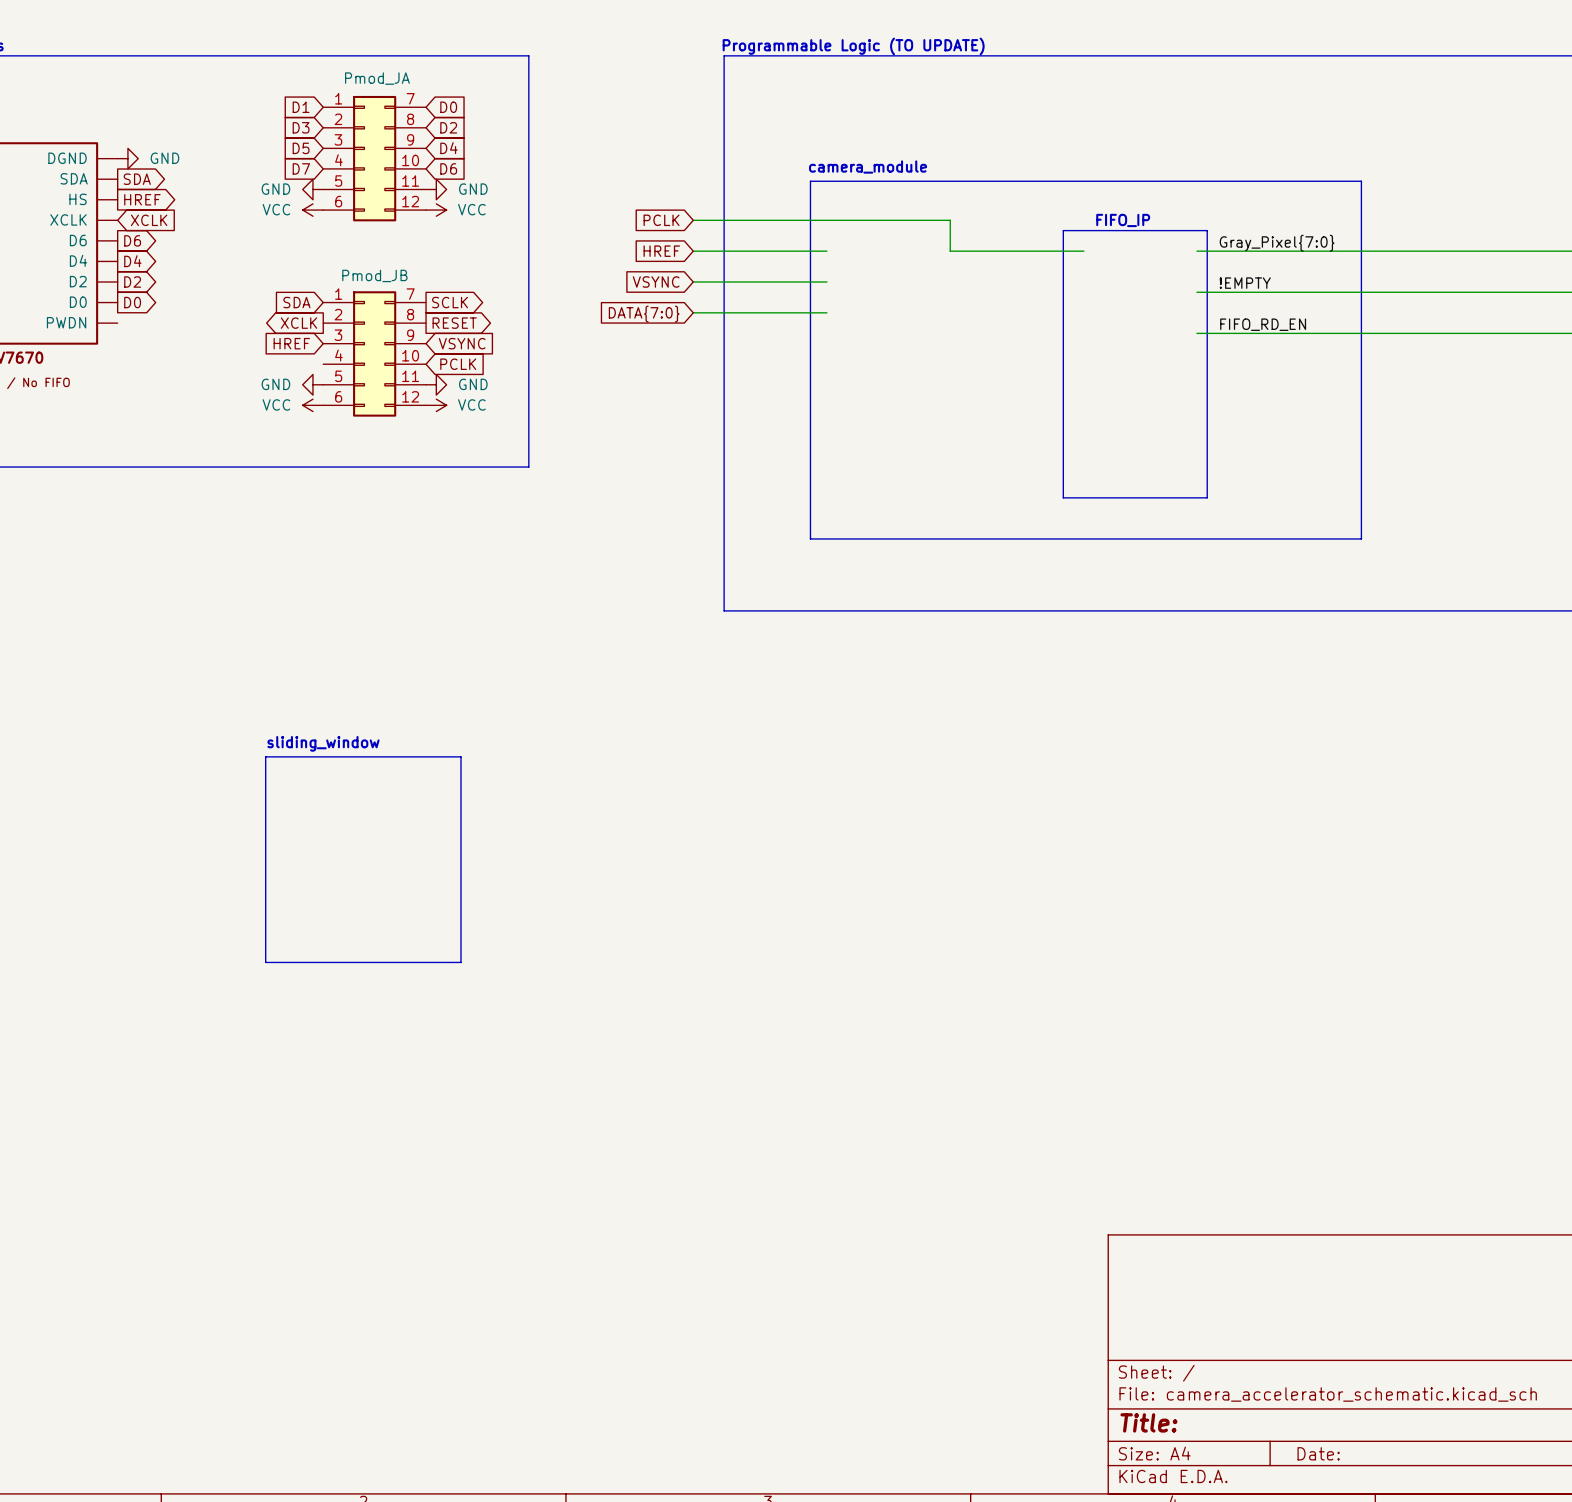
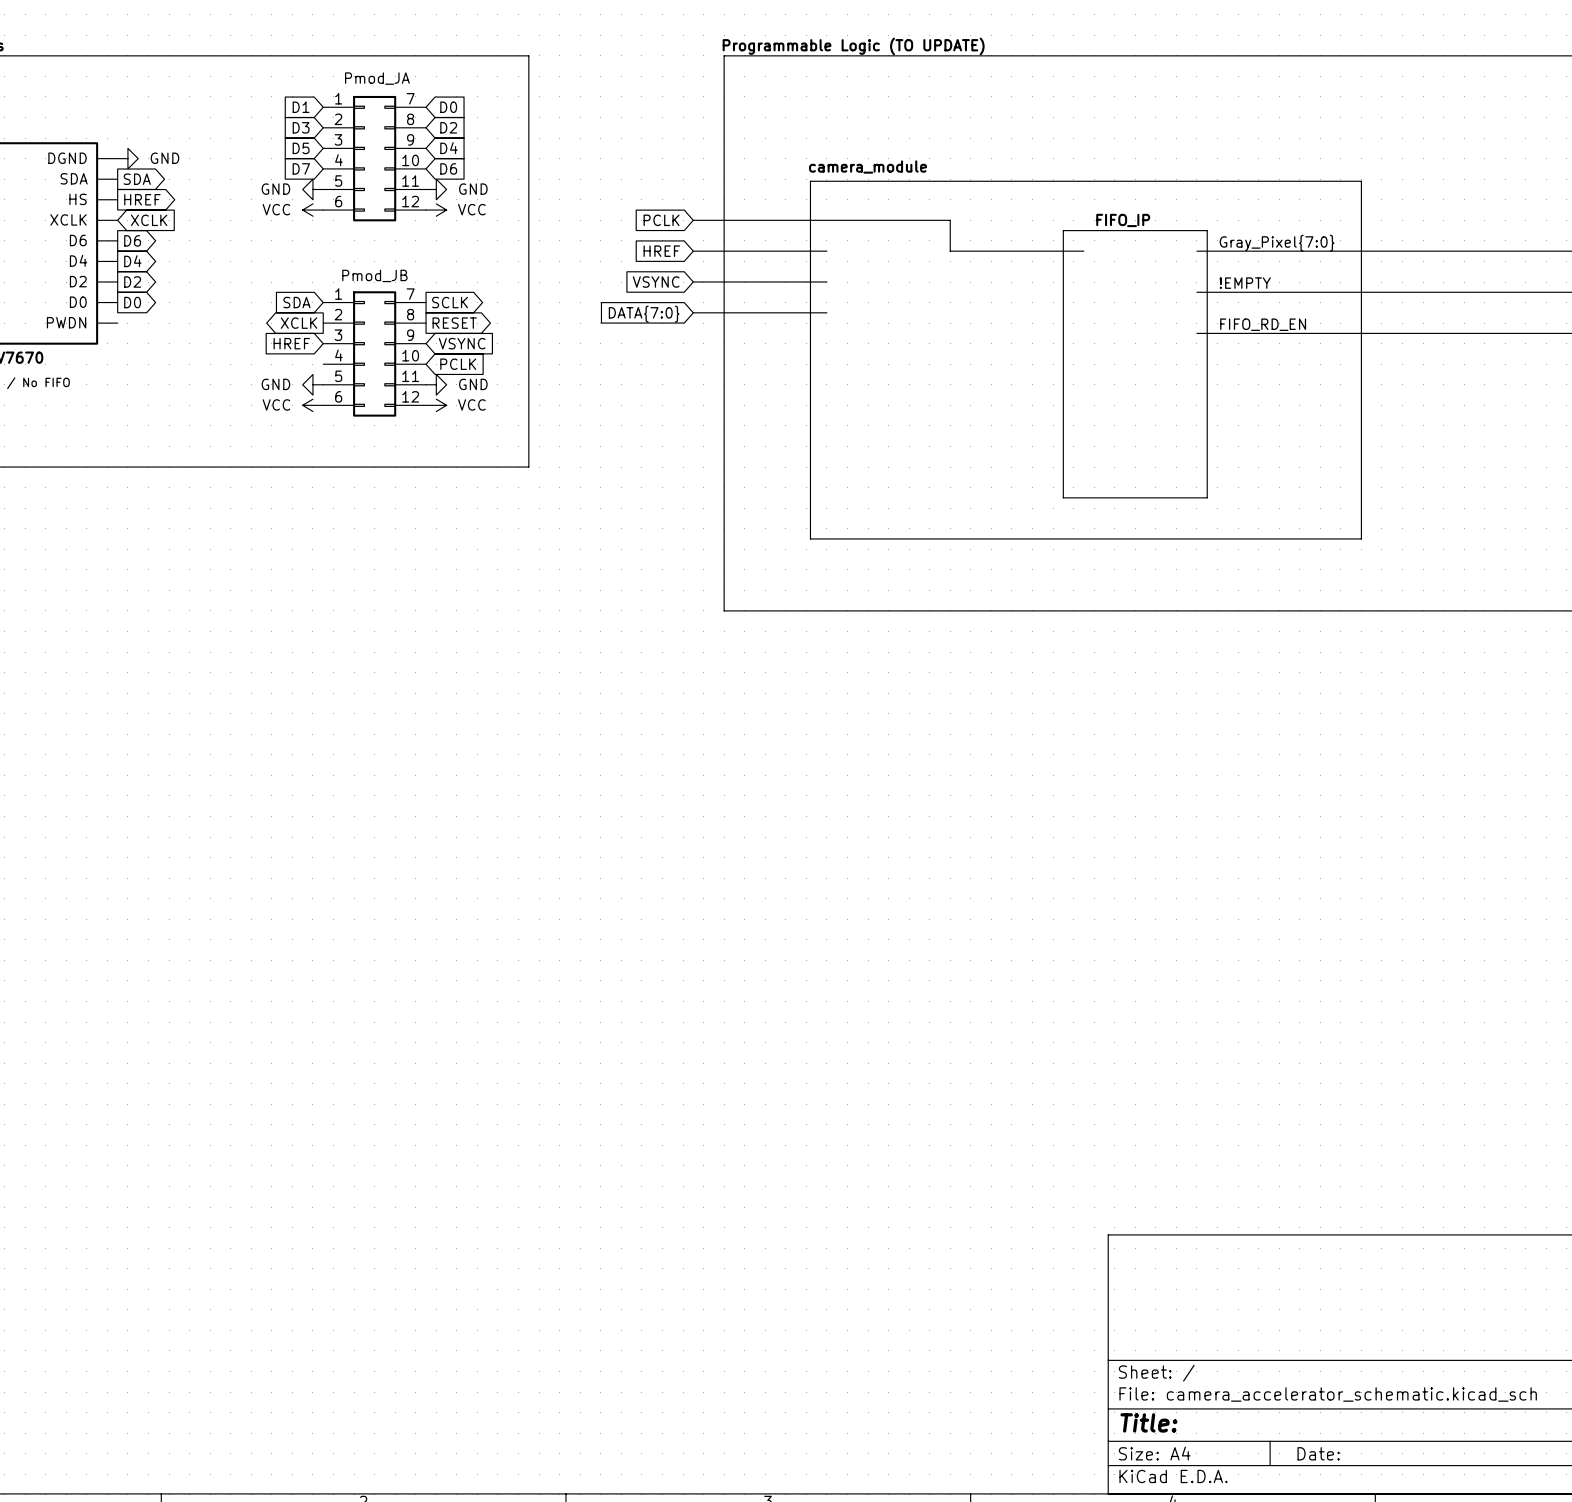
text: sliding_window (323, 743) -> none
line: (265, 756) (460, 756) (460, 962) (265, 962) (265, 756) -> none

